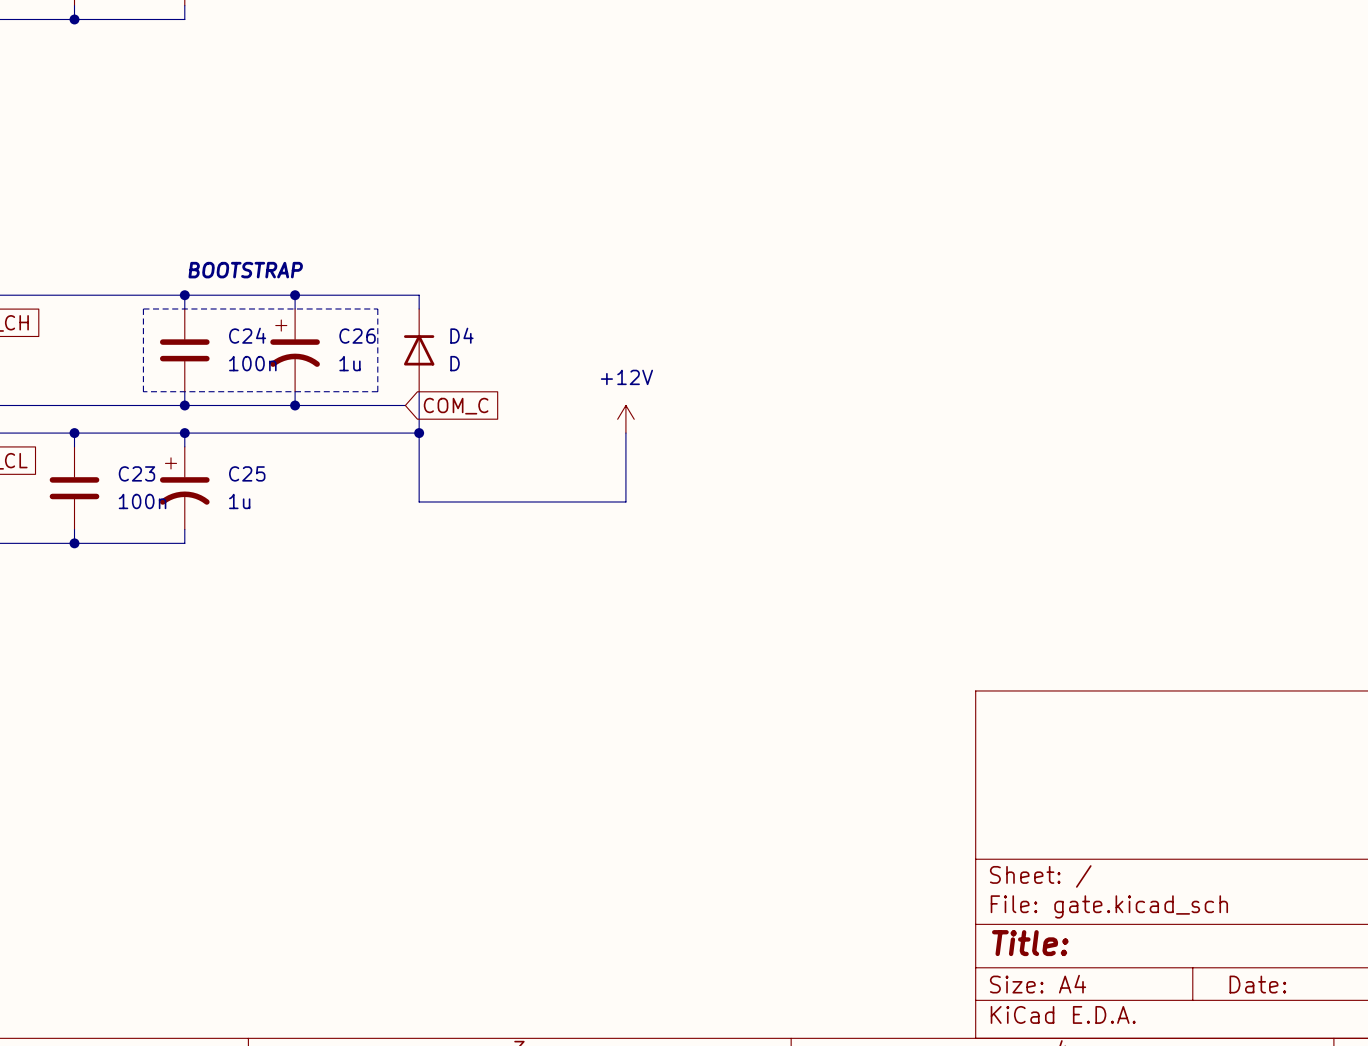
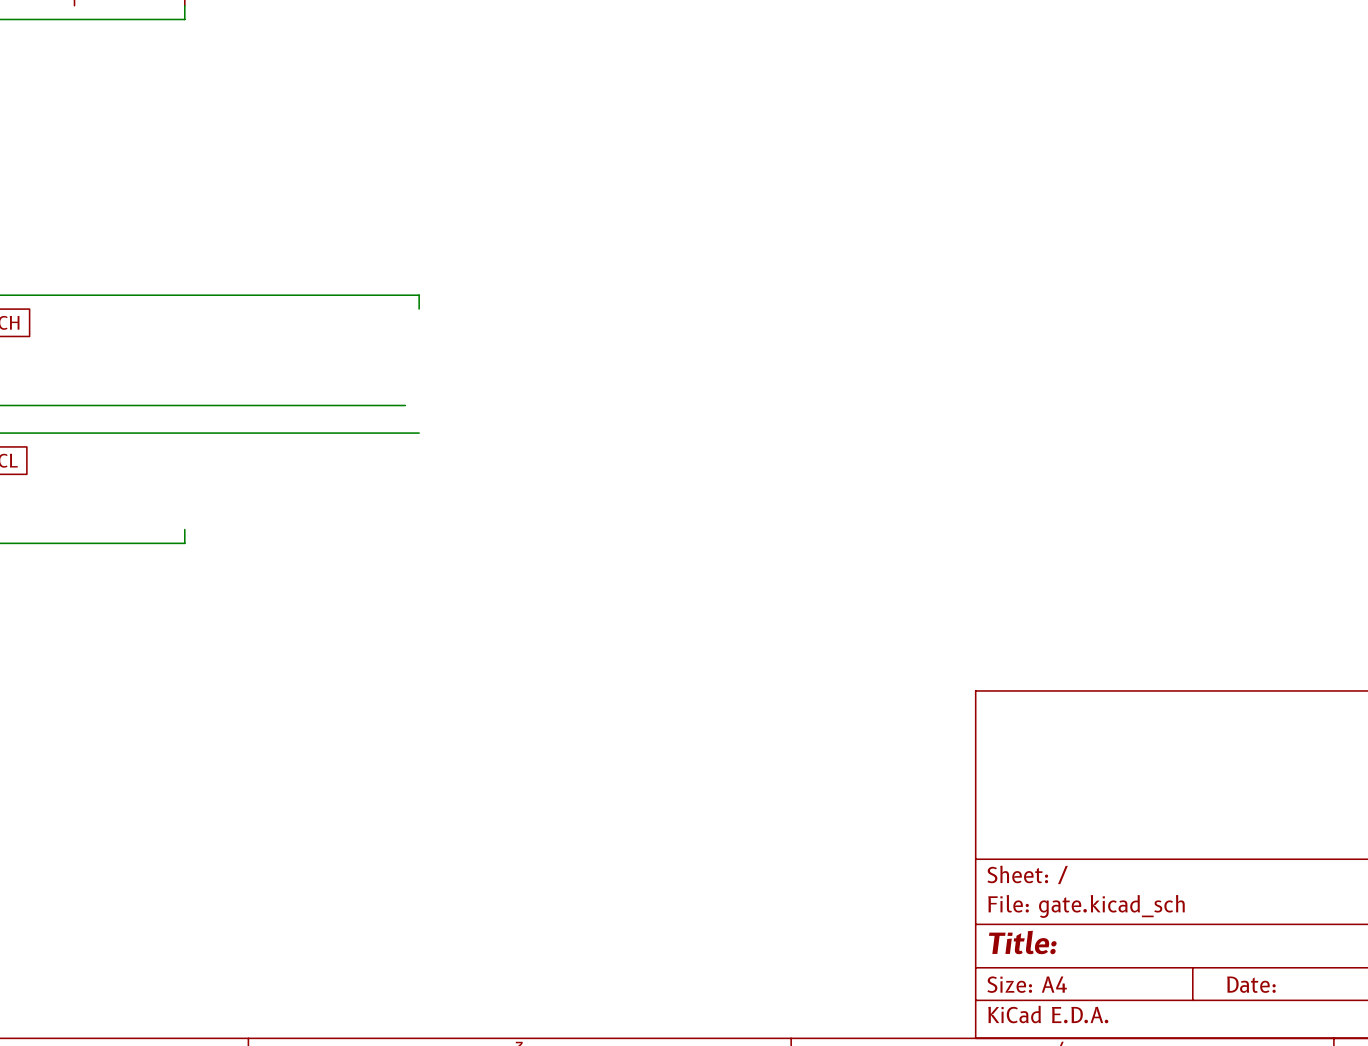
wire: (74, 5) (74, 19) -> none
junction: (74, 19) -> none
text: BOOTSTRAP (245, 270) -> none
wire: (184, 295) (184, 308) -> none
junction: (184, 295) -> none
wire: (295, 295) (295, 308) -> none
junction: (295, 295) -> none
line: (143, 308) (377, 308) (377, 391) (143, 391) (143, 308) -> none
C24: 100n (184, 350) -> none
C26: 1u (295, 350) -> none
D4: D (419, 350) -> none
wire: (184, 391) (184, 405) -> none
wire: (295, 391) (295, 405) -> none
wire: (419, 391) (419, 501) (625, 501) (625, 433) -> none
junction: (184, 405) -> none
junction: (295, 405) -> none
global label: COM_C (456, 406) -> none
power symbol: +12V (625, 419) -> none
wire: (74, 433) (74, 446) -> none
junction: (74, 433) -> none
wire: (184, 433) (184, 446) -> none
junction: (184, 433) -> none
junction: (419, 433) -> none
C23: 100n (74, 488) -> none
C25: 1u (184, 488) -> none
wire: (74, 529) (74, 543) -> none
junction: (74, 543) -> none

